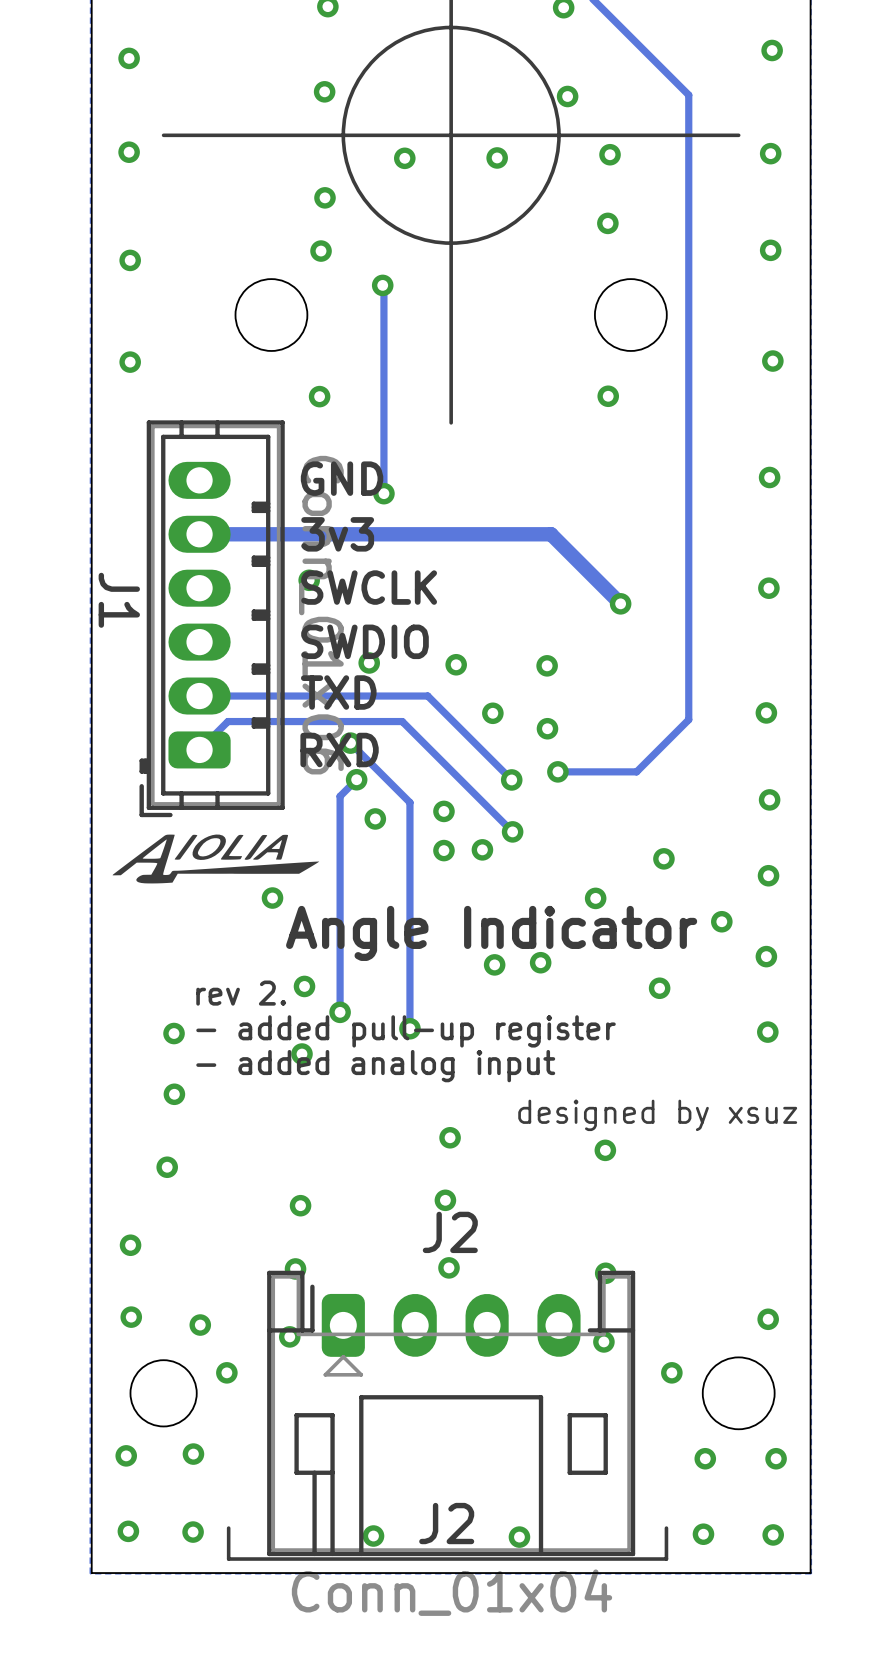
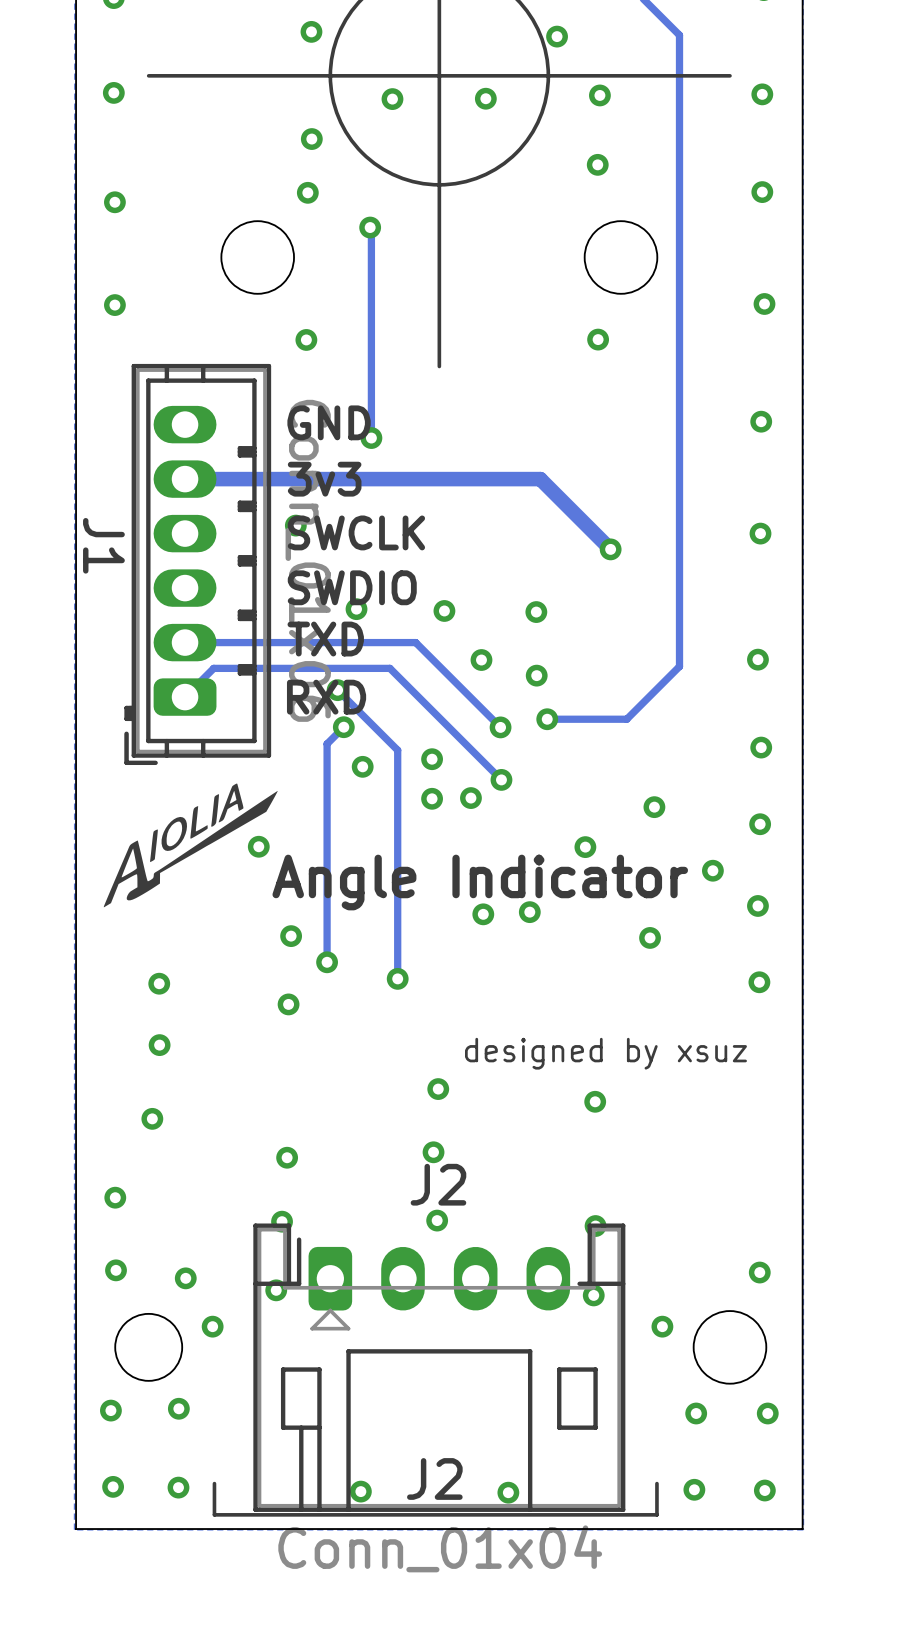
drawing: [112, 834, 320, 884] -> none
drawing: none -> [103, 783, 278, 908]
text: rev 2. (241, 993) -> none
text: - added pull-up register (406, 1031) -> none
text: - added analog input (375, 1066) -> none
text position: designed by xsuz (657, 1115) -> designed by xsuz (605, 1053)

